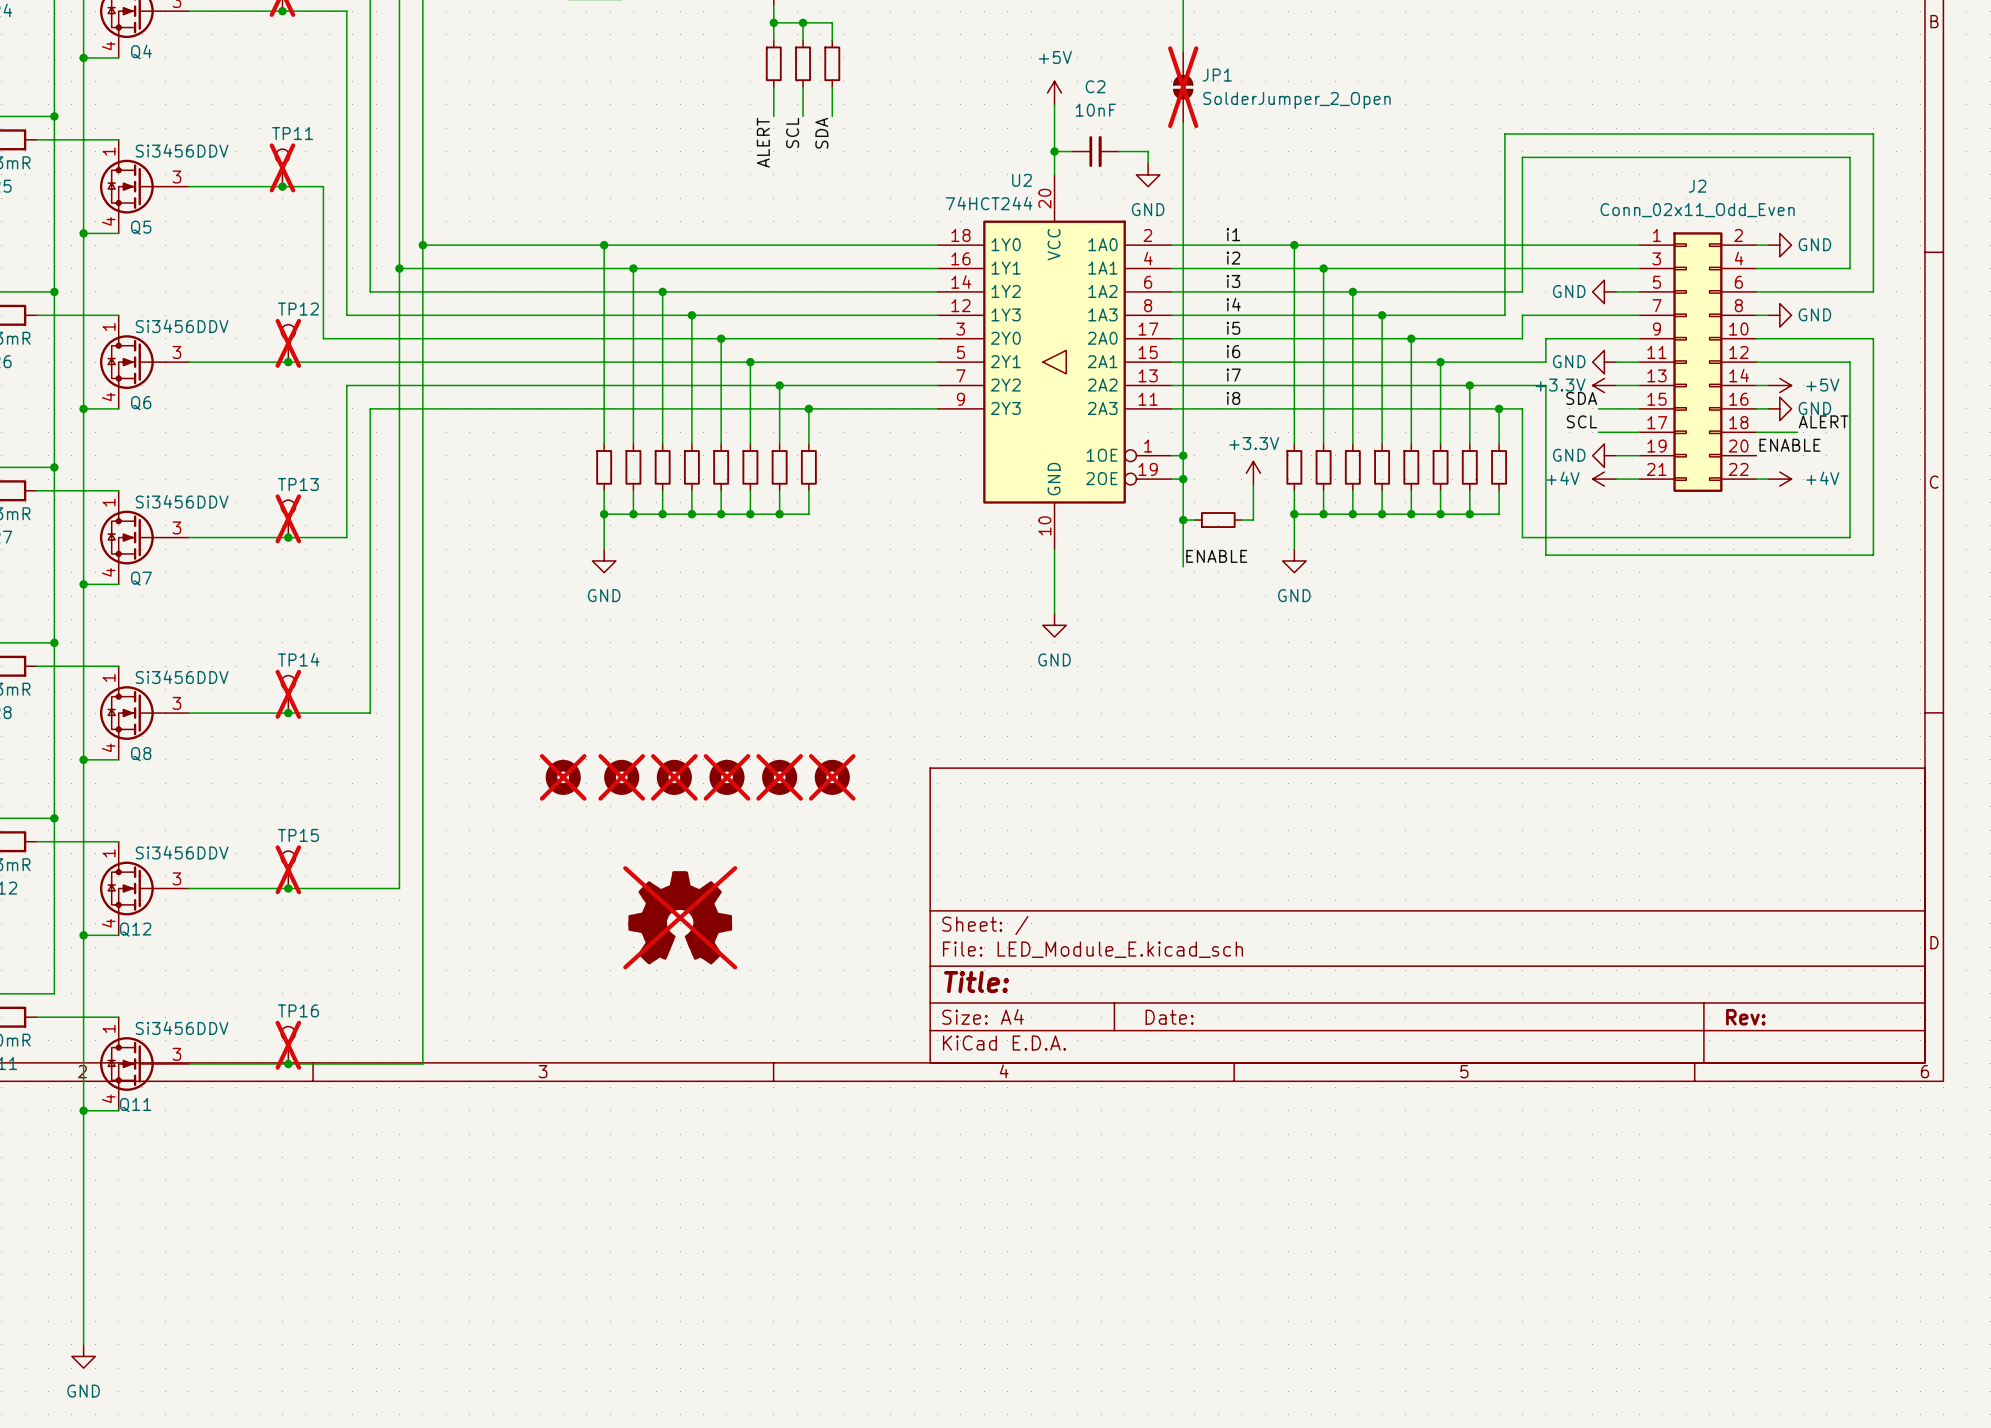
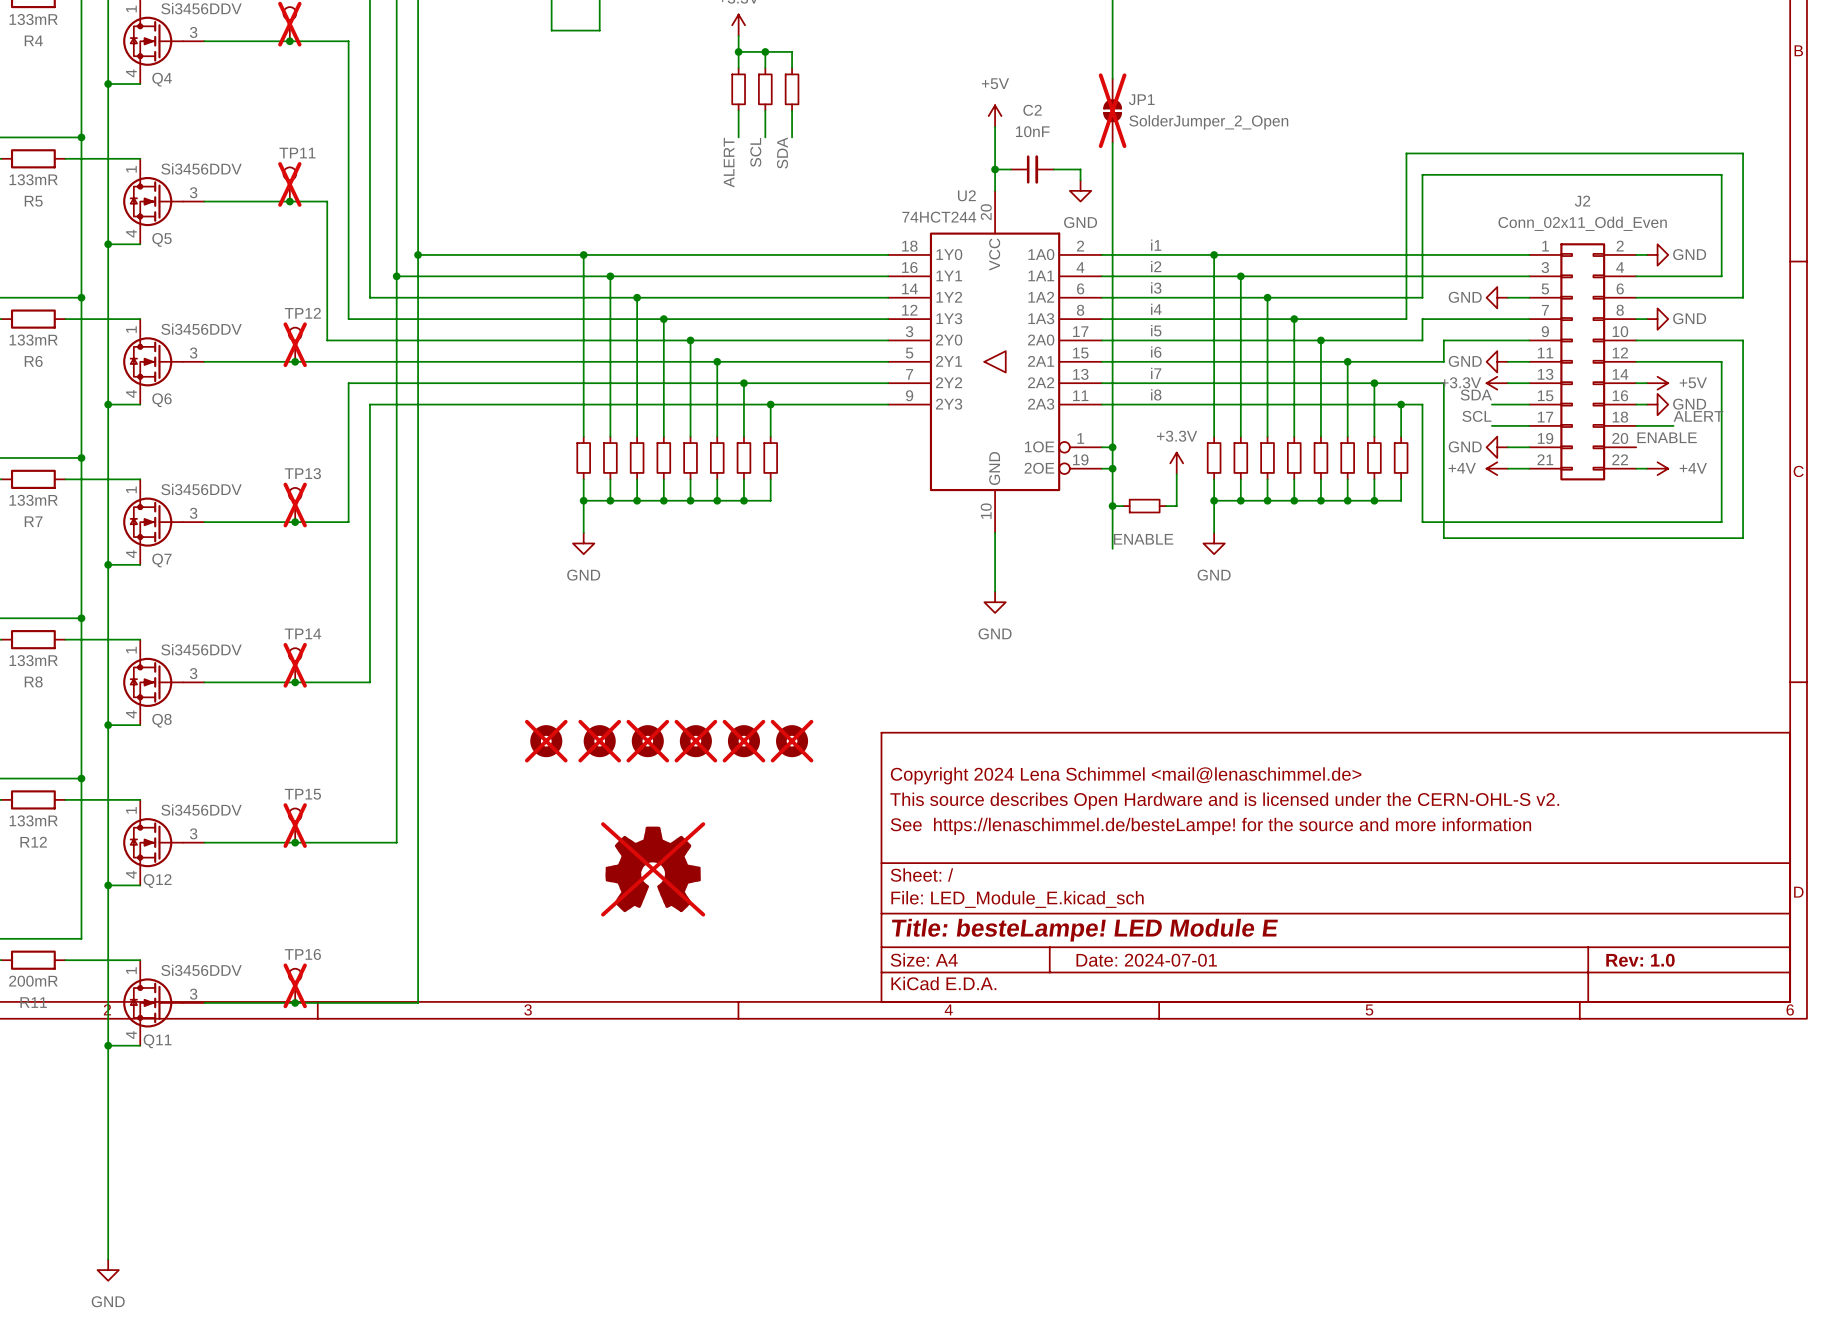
title block: none -> Copyright 2024 Lena Schimmel <mail@lenaschimmel.de> (1126, 775)
title block: none -> This source describes Open Hardware and is licensed under the CERN-OHL-S v2. (1224, 801)
title block: none -> See https://lenaschimmel.de/besteLampe! for the source and more information (1210, 826)
title block: Title: (976, 982) -> Title: besteLampe! LED Module E (1084, 930)
title block: Date: (1169, 1017) -> Date: 2024-07-01 (1146, 960)
title block: Rev: (1745, 1017) -> Rev: 1.0 (1640, 960)

